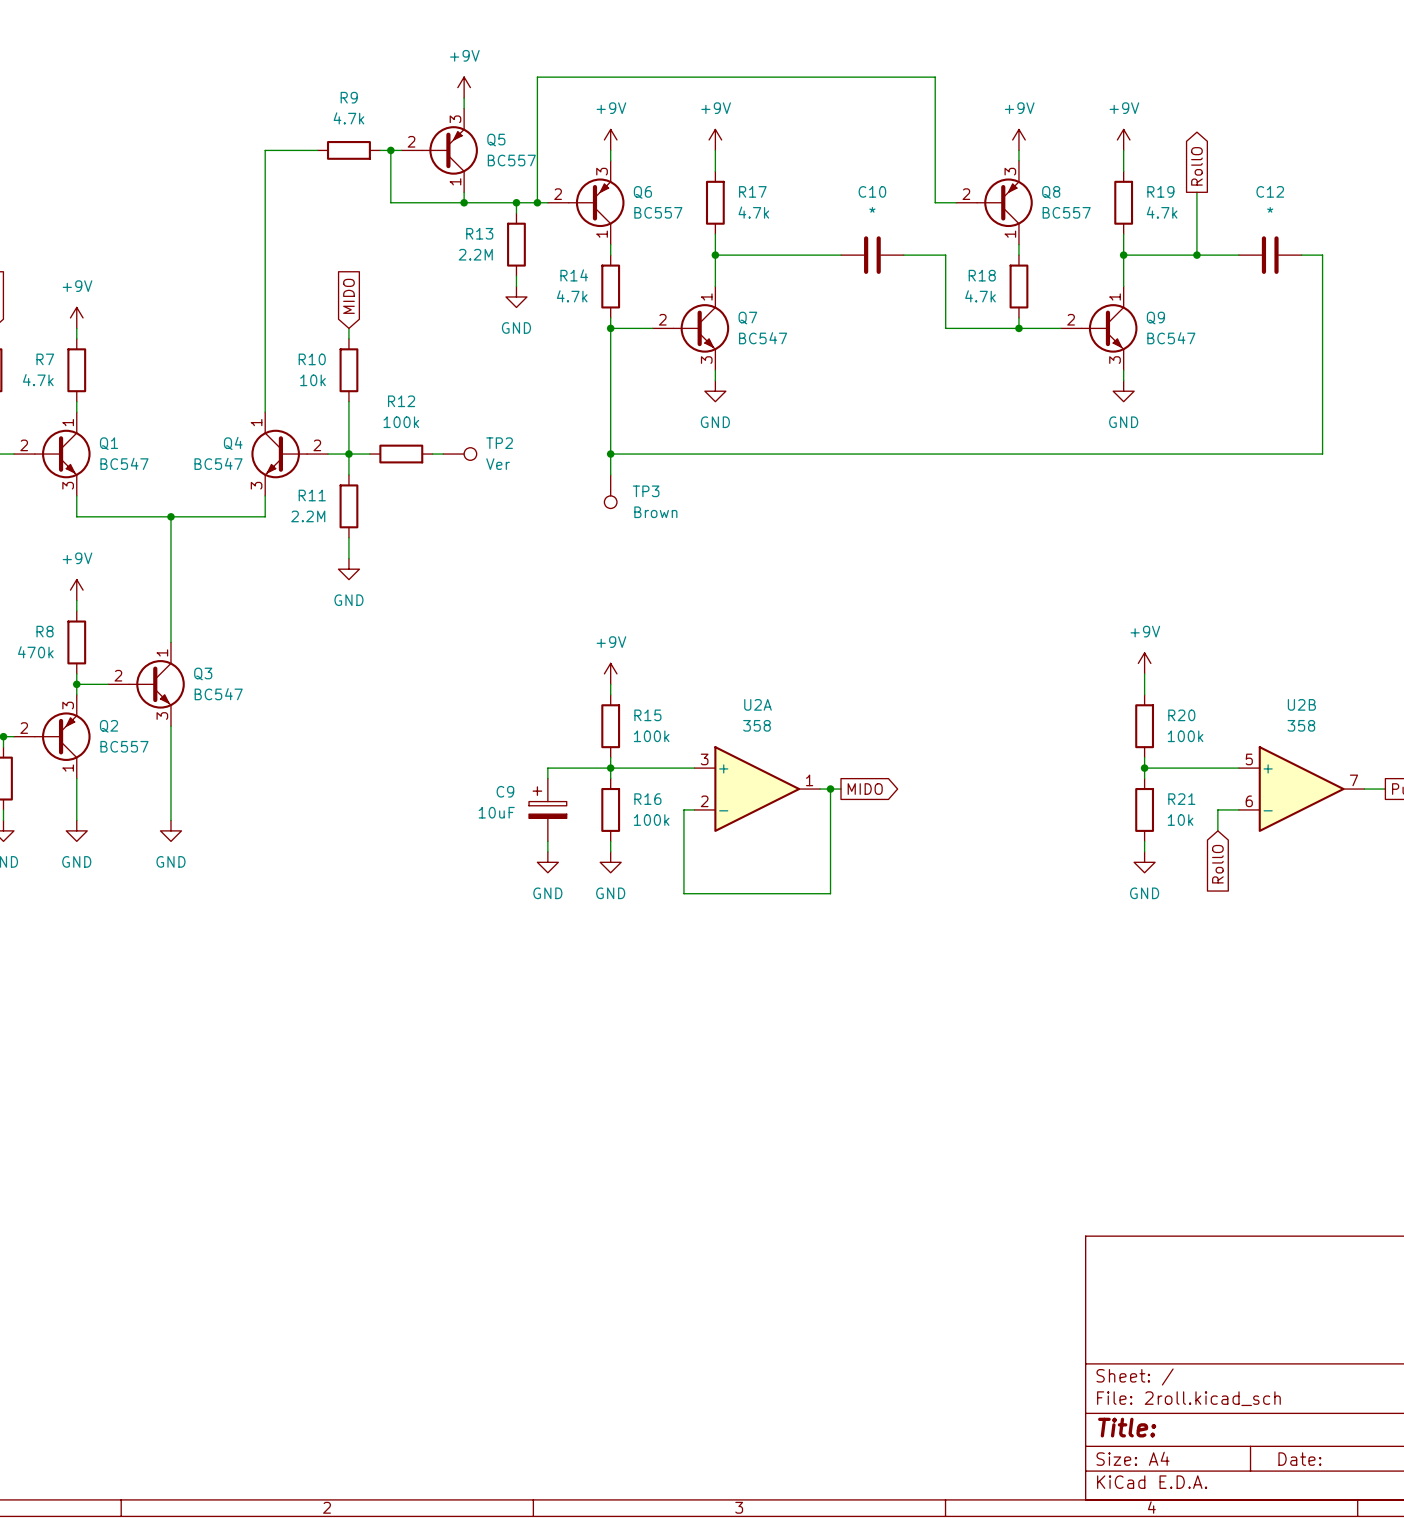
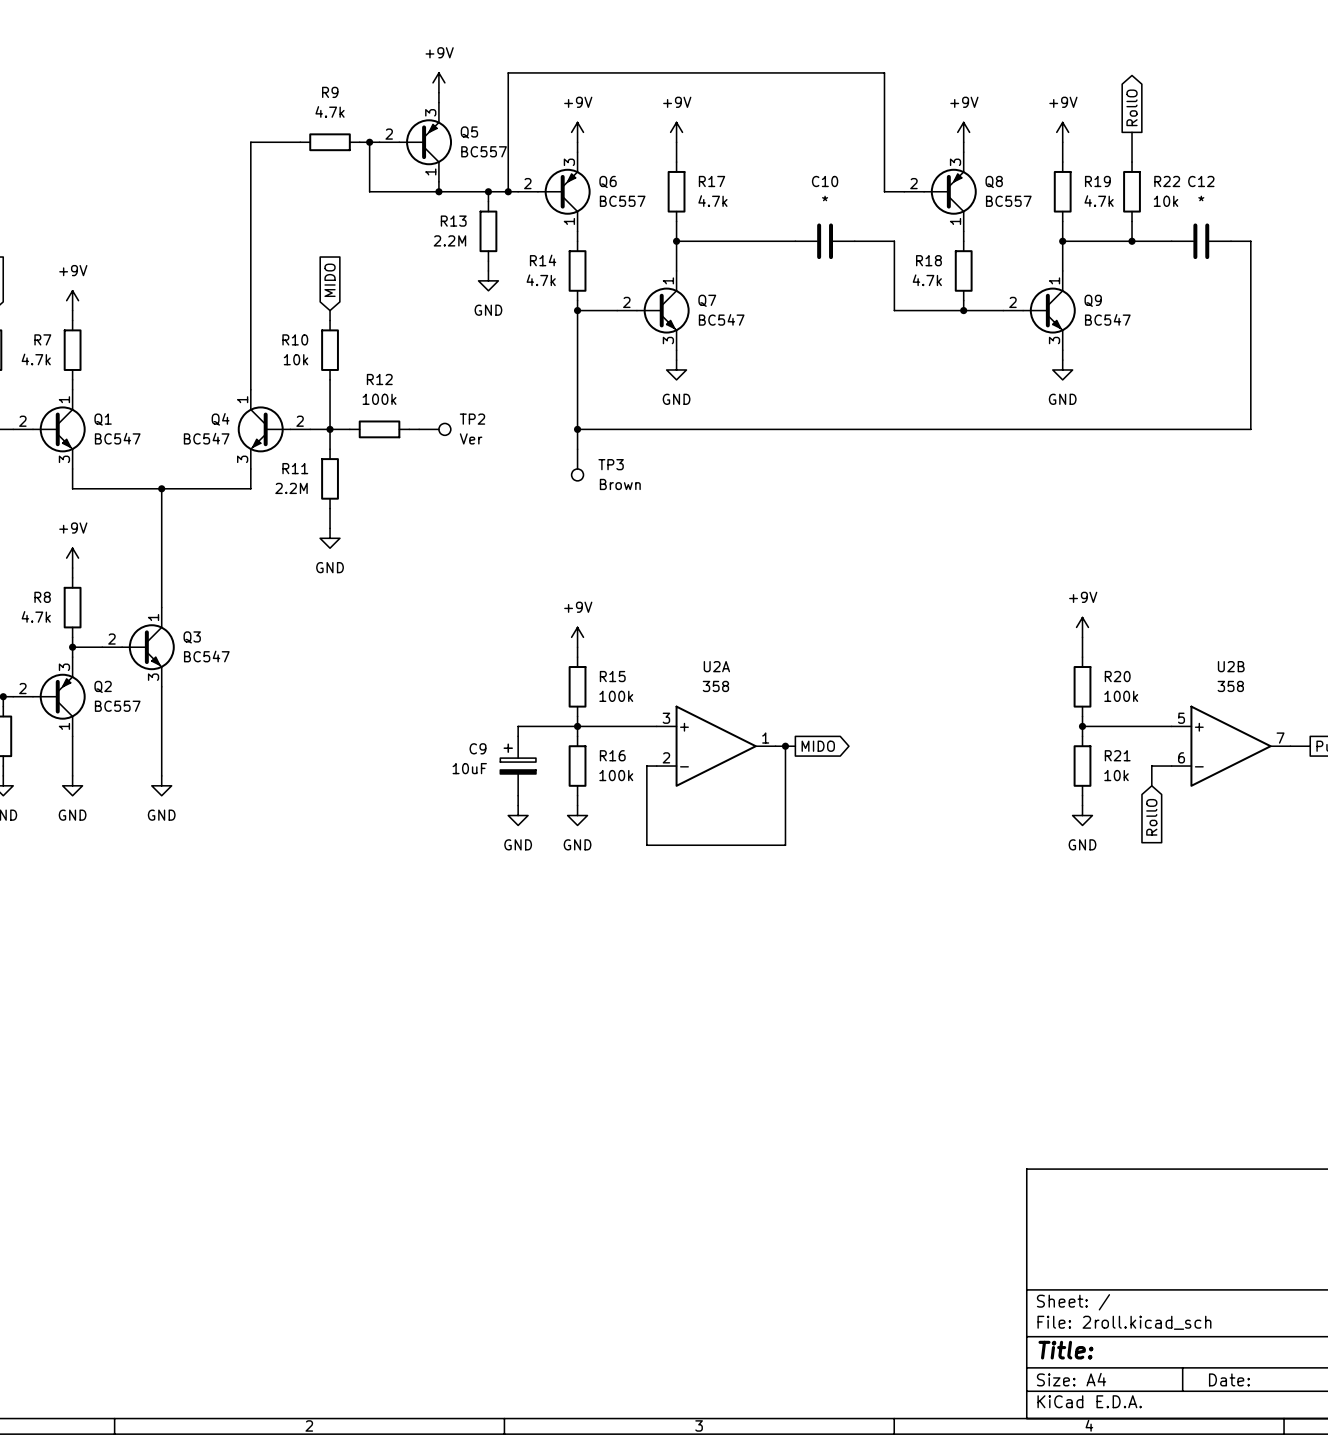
wire: none -> (1132, 132) (1132, 162)
global label position: RollO (1196, 166) -> RollO (1132, 107)
wire: (1196, 192) (1196, 234) -> none
R22: none -> 10k (1132, 191)
R8 value: 470k (35, 652) -> 4.7k (36, 616)

